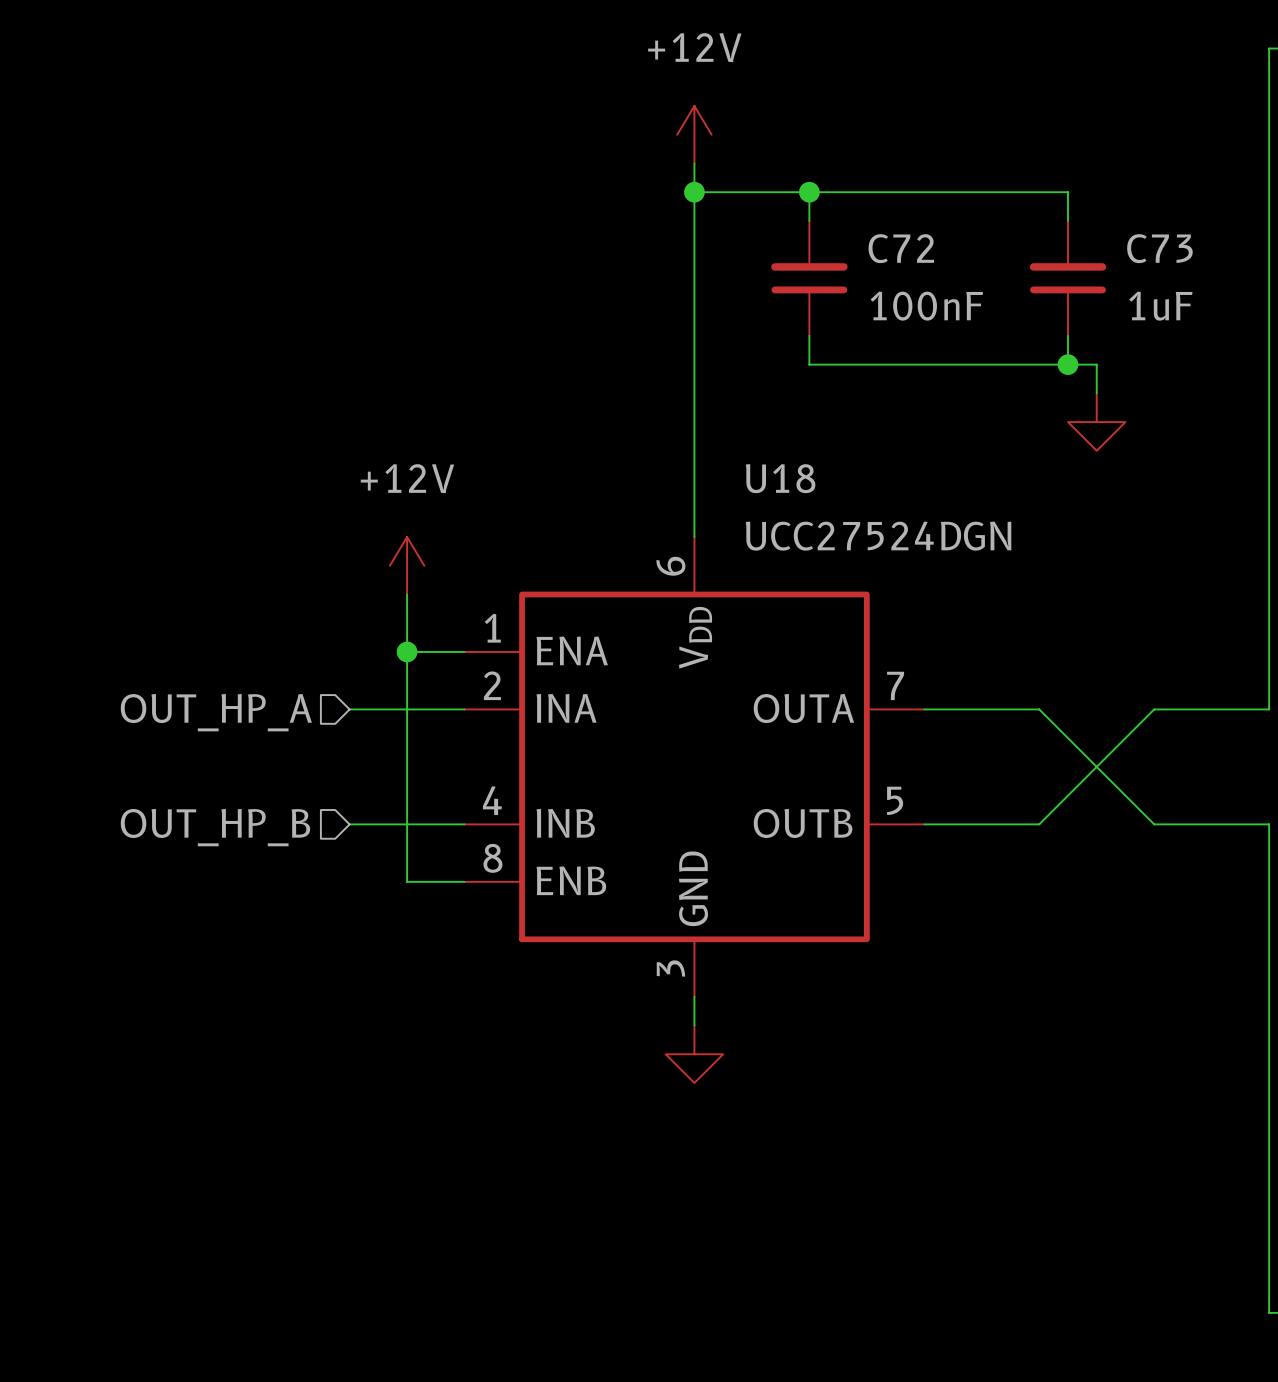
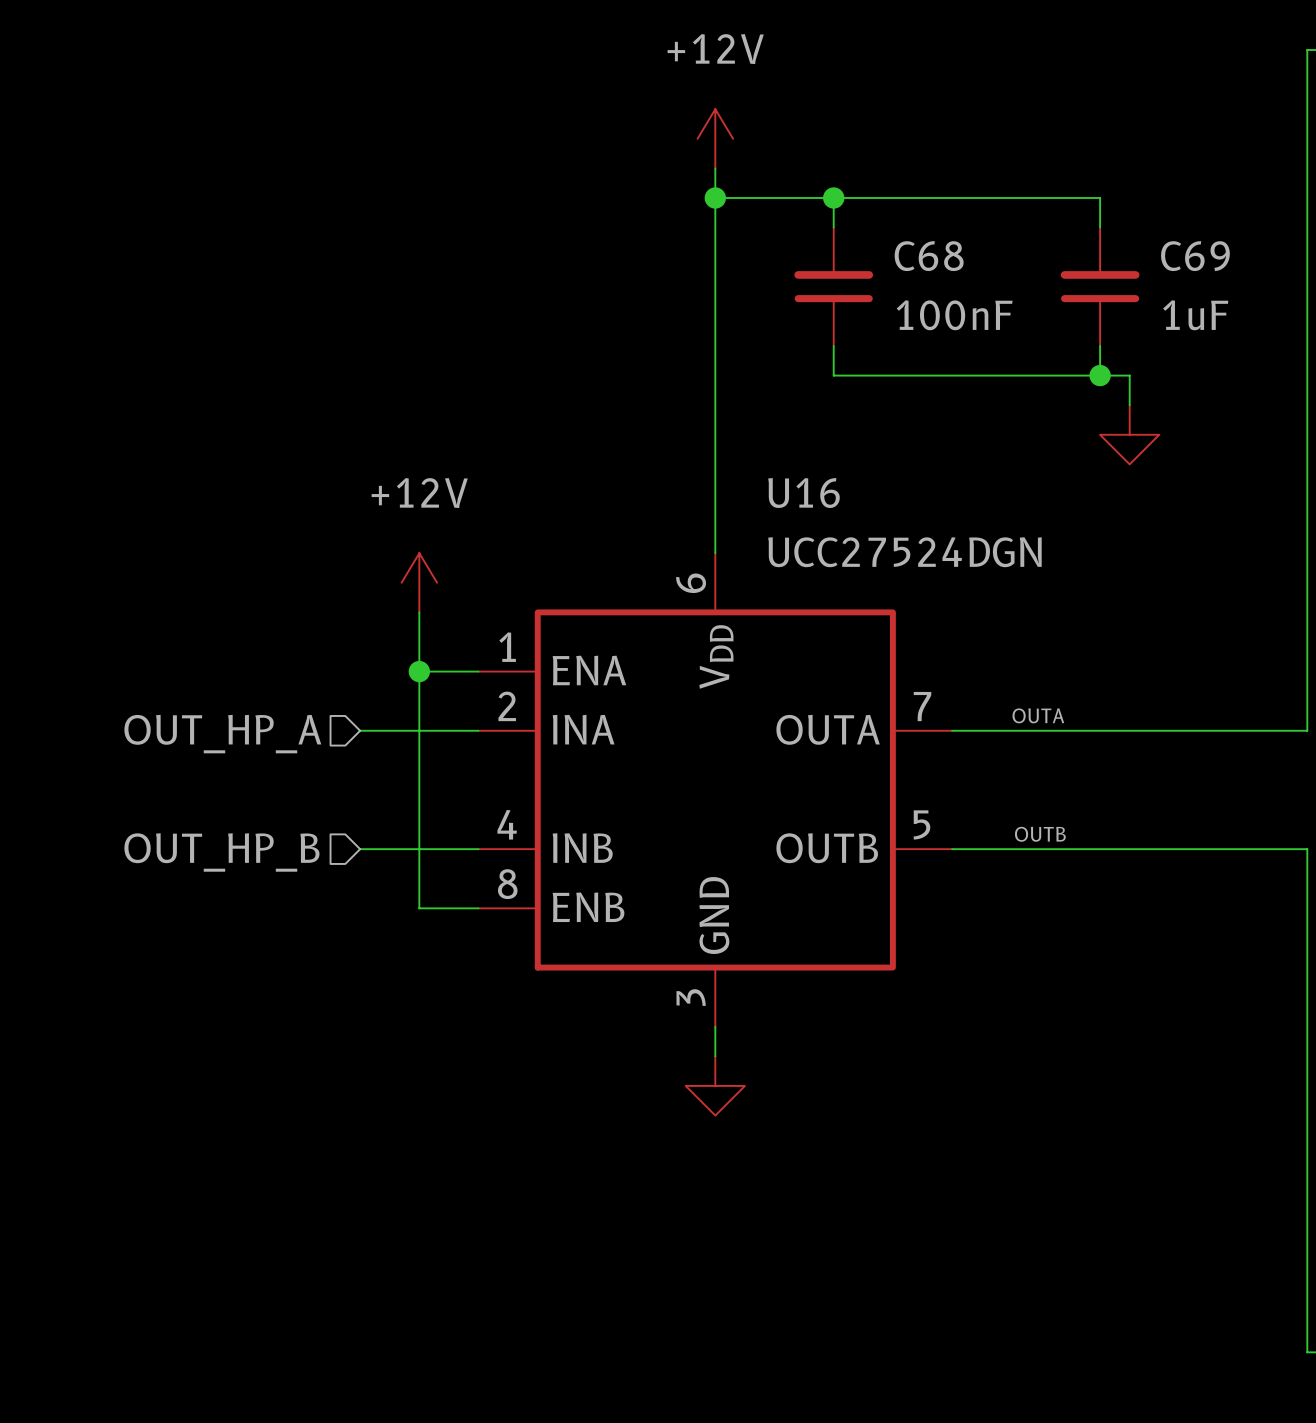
C72 name: C72 (901, 248) -> C68 (929, 256)
C73 name: C73 (1159, 248) -> C69 (1195, 256)
U18 name: U18 (780, 478) -> U16 (803, 493)
label: none -> OUTA (1038, 715)
wire: (1039, 709) (1154, 824) -> (1070, 730) (1188, 730)
wire: (1154, 709) (1039, 824) -> (1188, 849) (1070, 849)
label: none -> OUTB (1040, 834)

